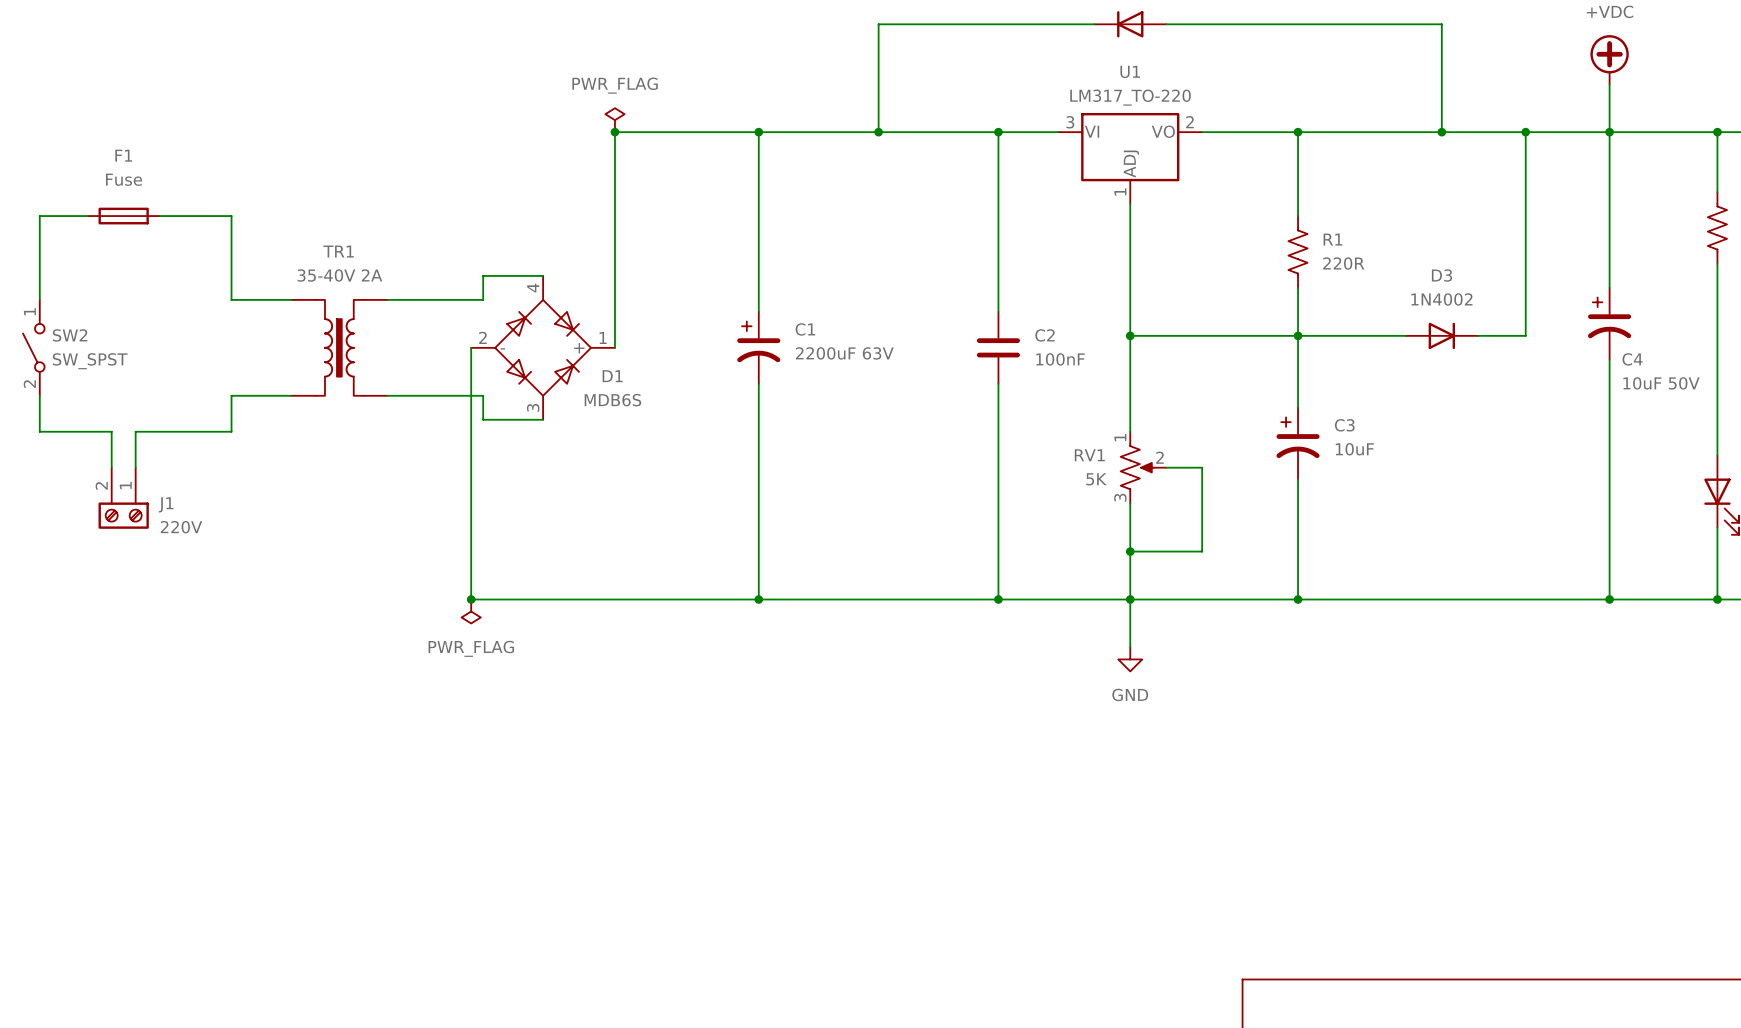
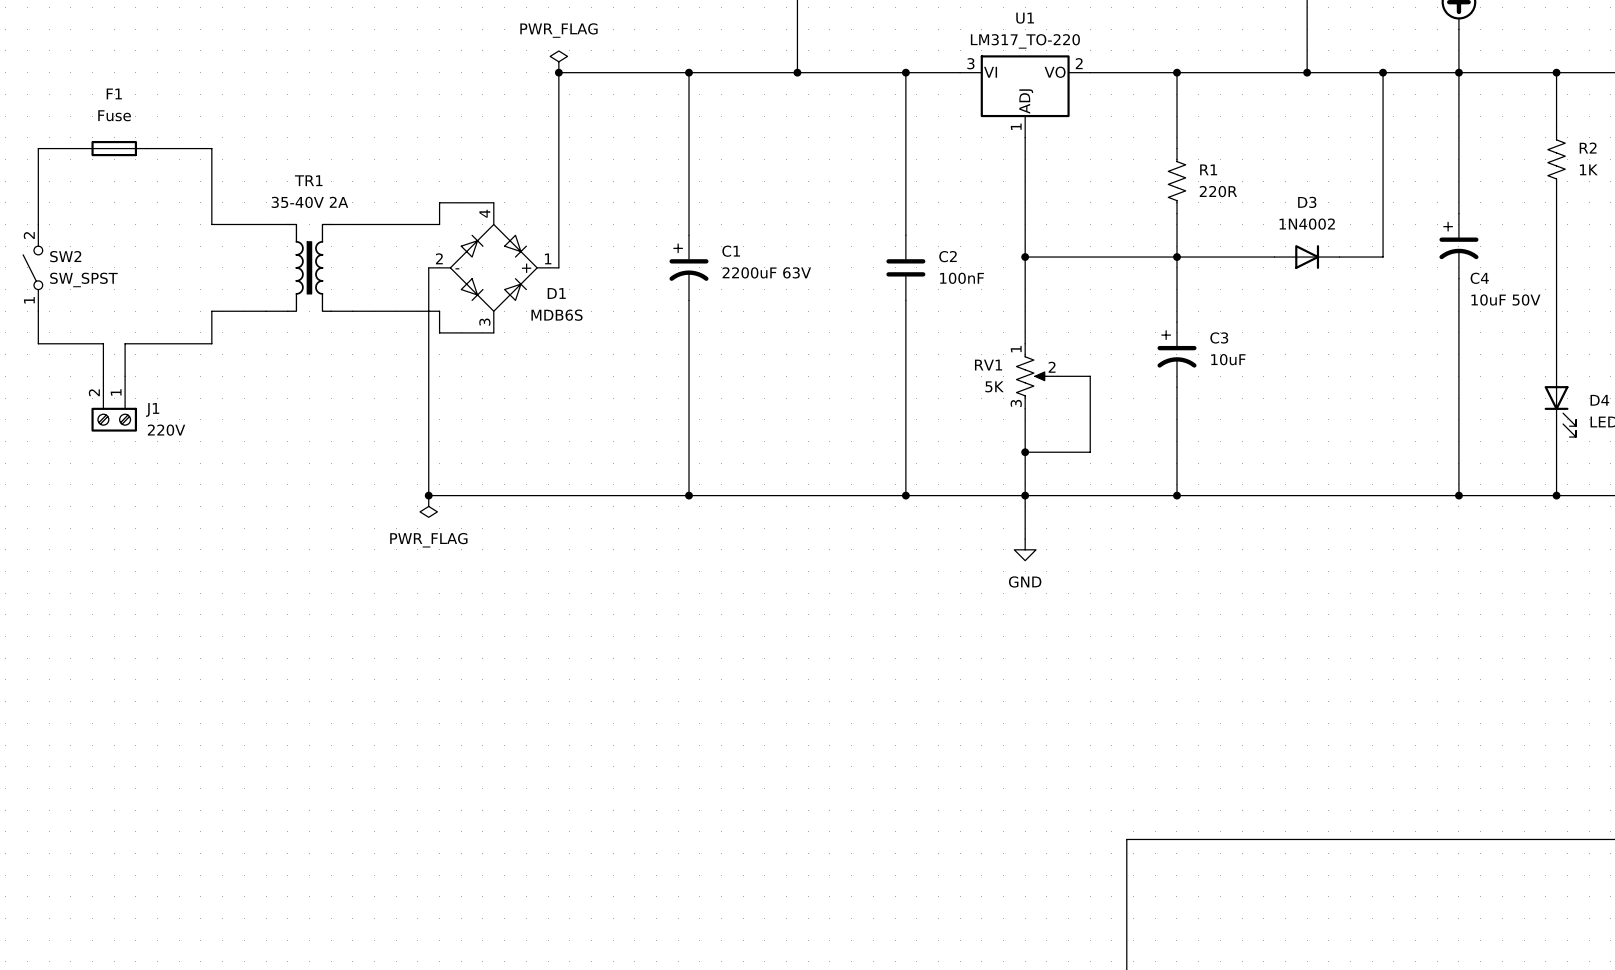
SW2 pin number: 1 (29, 311) -> 2 (29, 235)
SW2 pin number: 2 (29, 384) -> 1 (29, 300)

